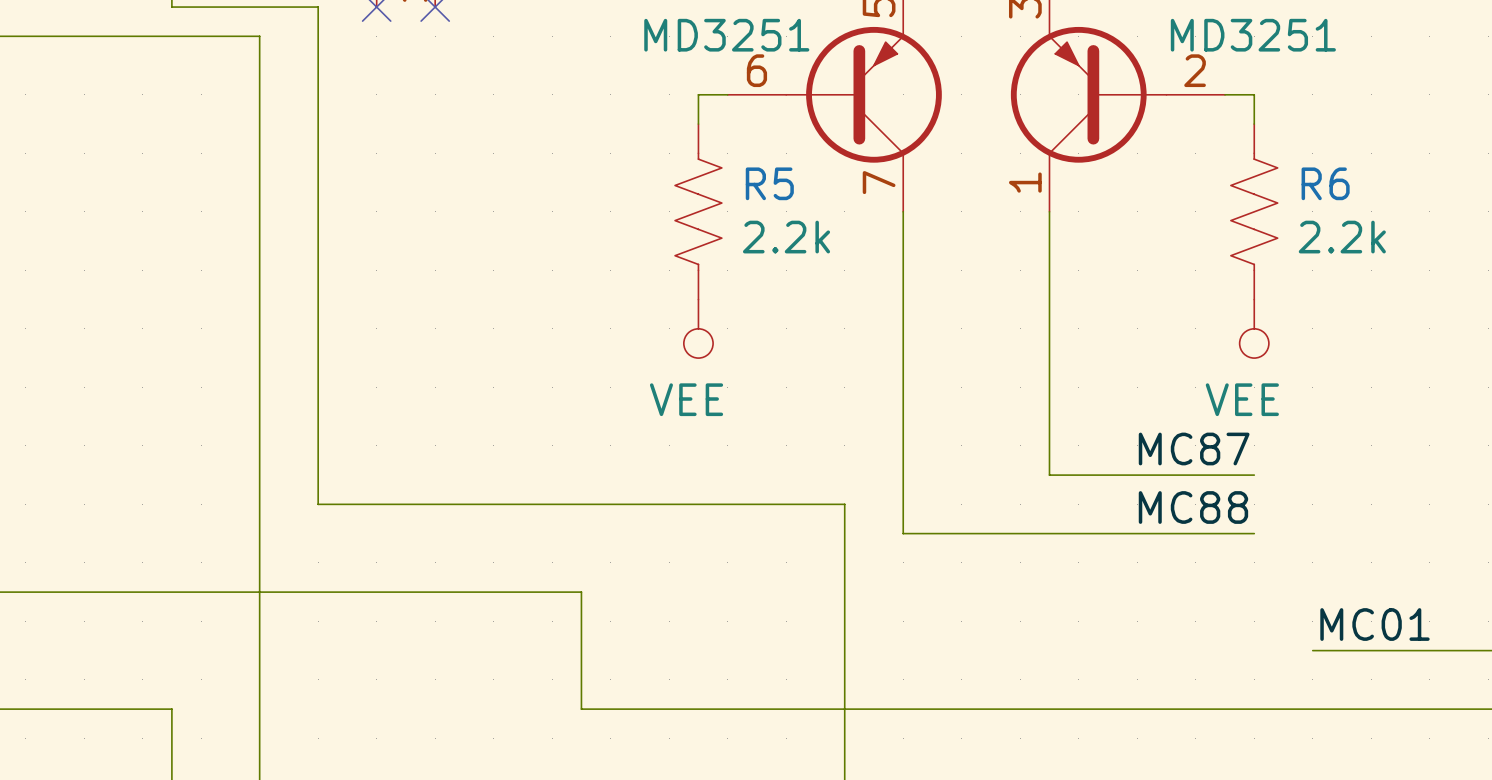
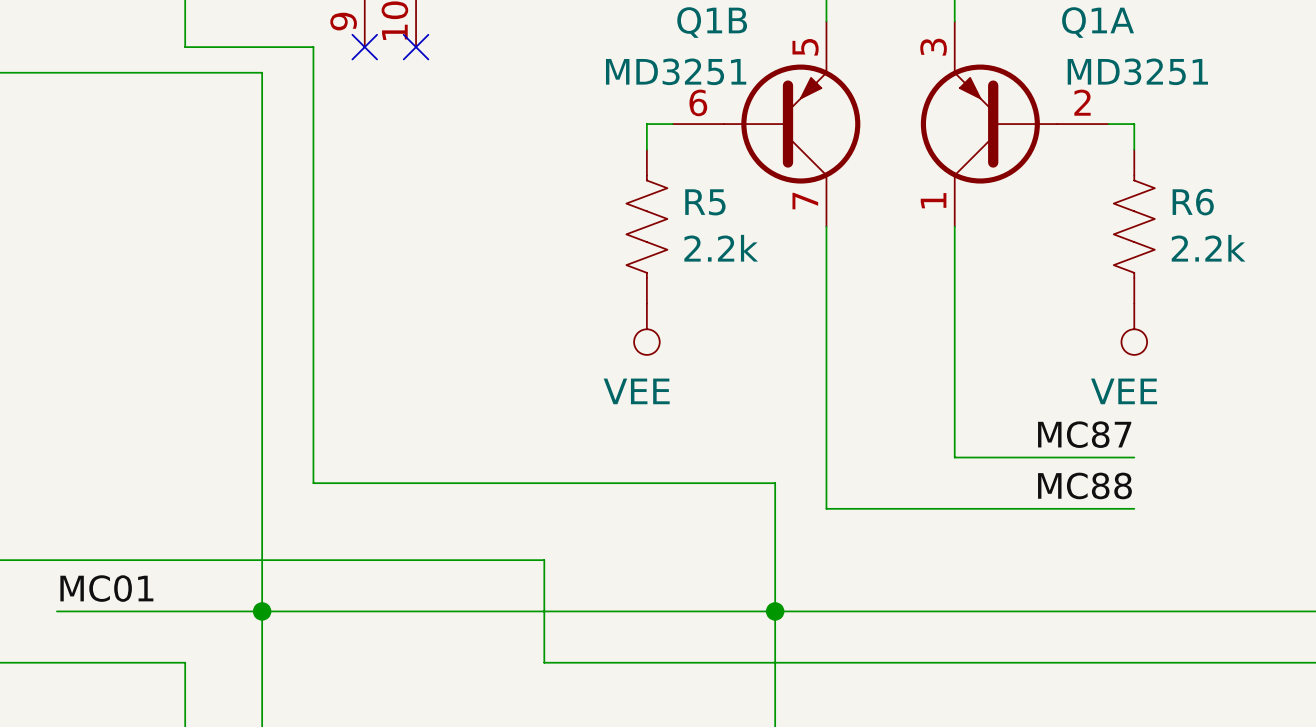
label: none -> MC01 (106, 588)
label: MC01 (1374, 624) -> none
wire: none -> (56, 611) (1185, 611)
junction: none -> (262, 611)
junction: none -> (775, 611)

